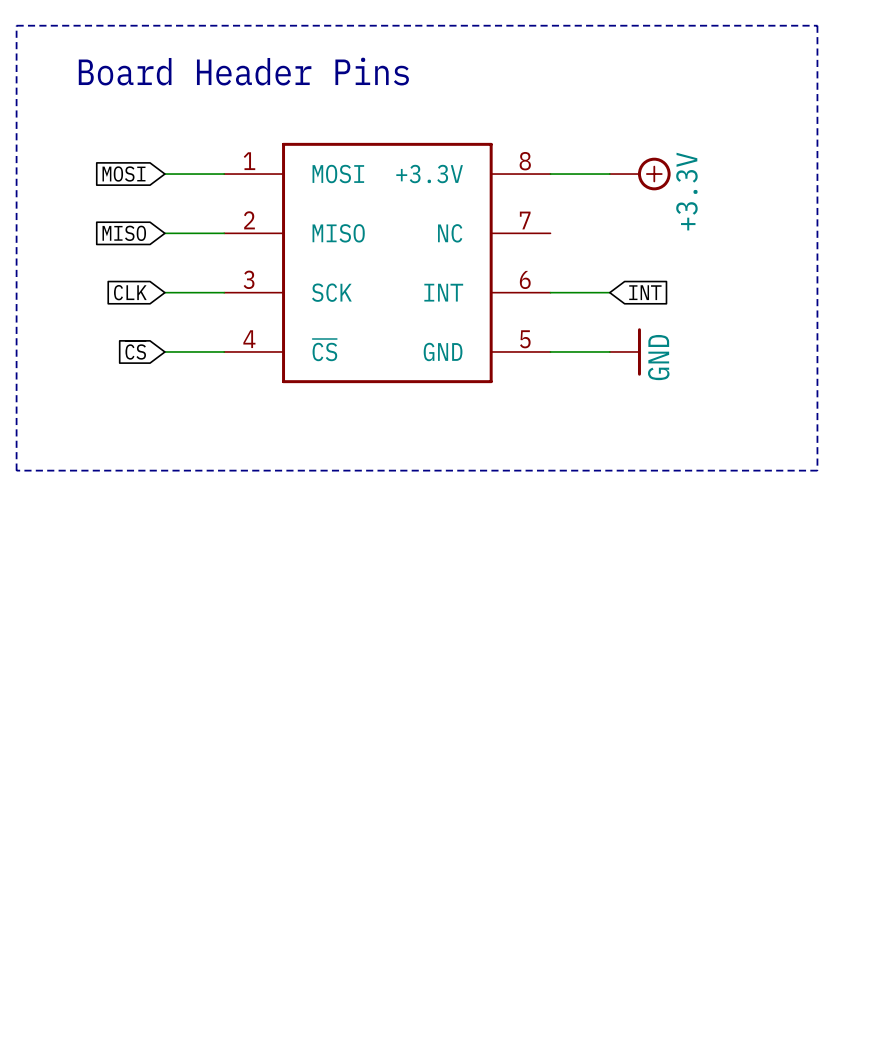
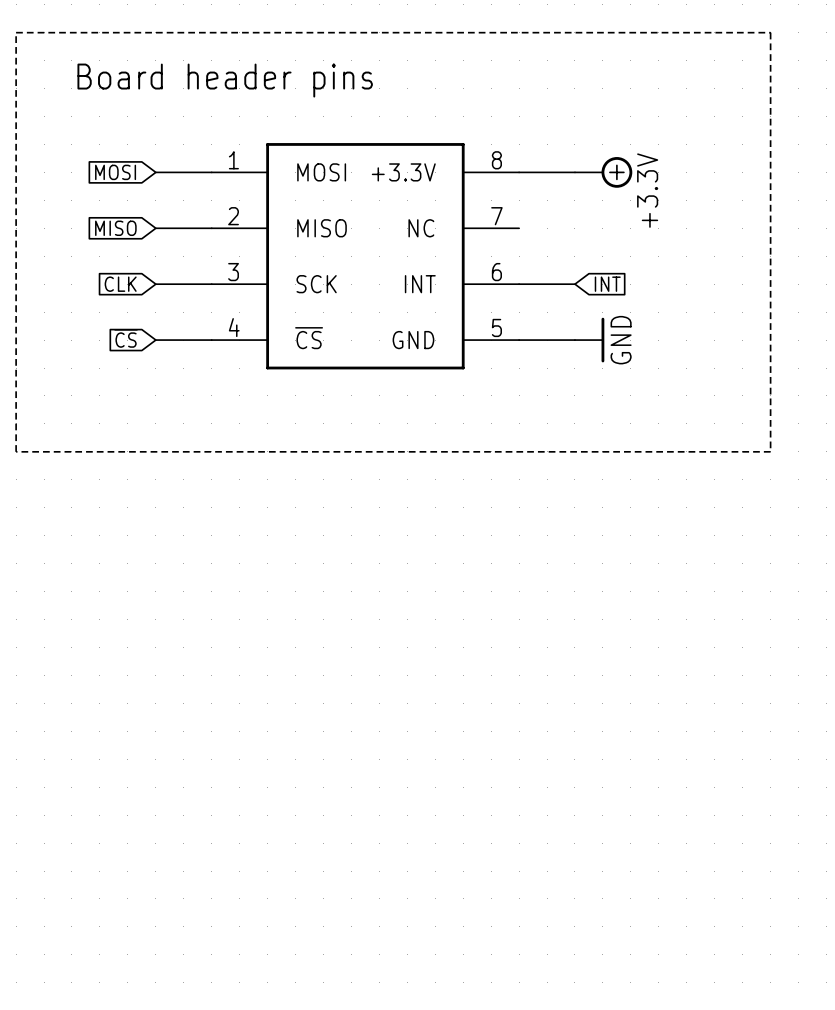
text: Board Header Pins (243, 71) -> Board header pins (225, 80)

